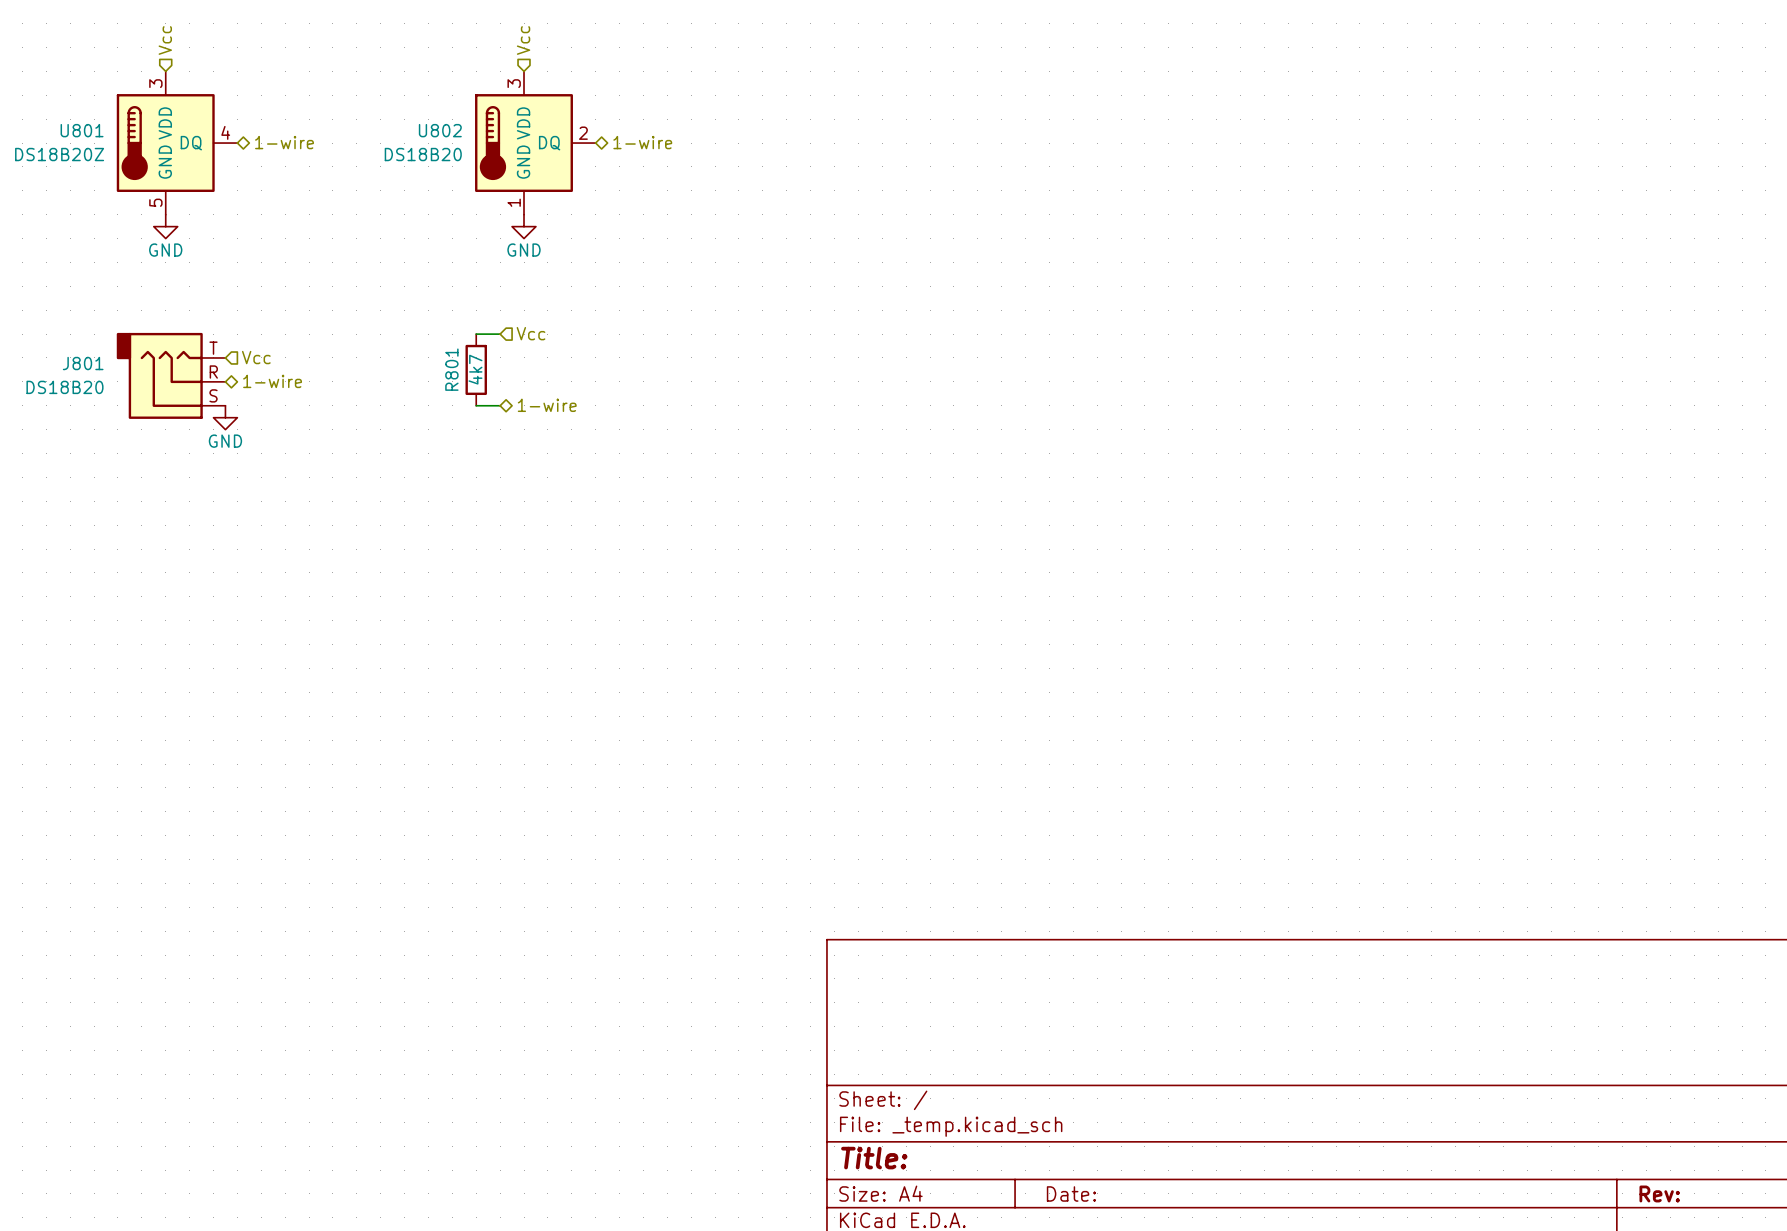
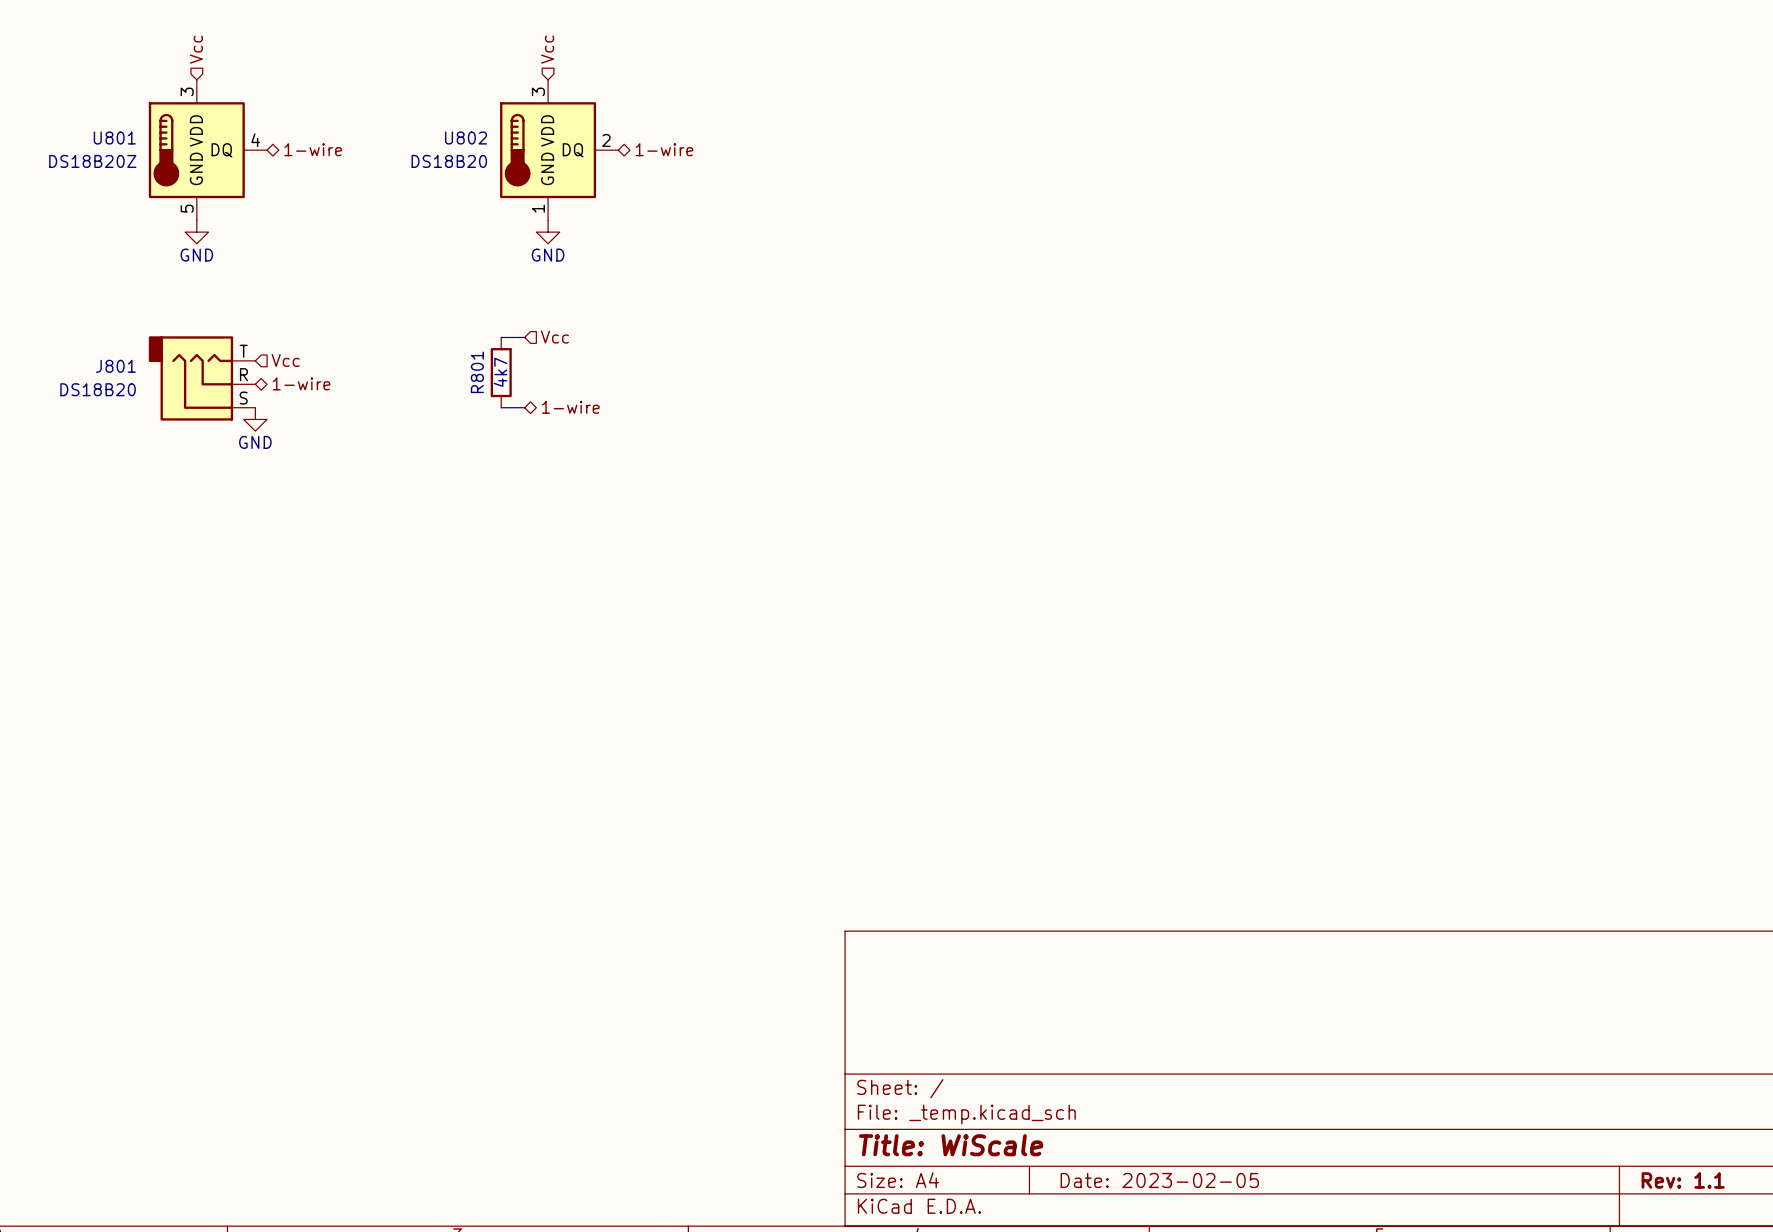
title block: Title: (874, 1158) -> Title: WiScale (951, 1145)
title block: Date: (1071, 1193) -> Date: 2023-02-05 (1159, 1180)
title block: Rev: (1659, 1193) -> Rev: 1.1 (1683, 1180)

